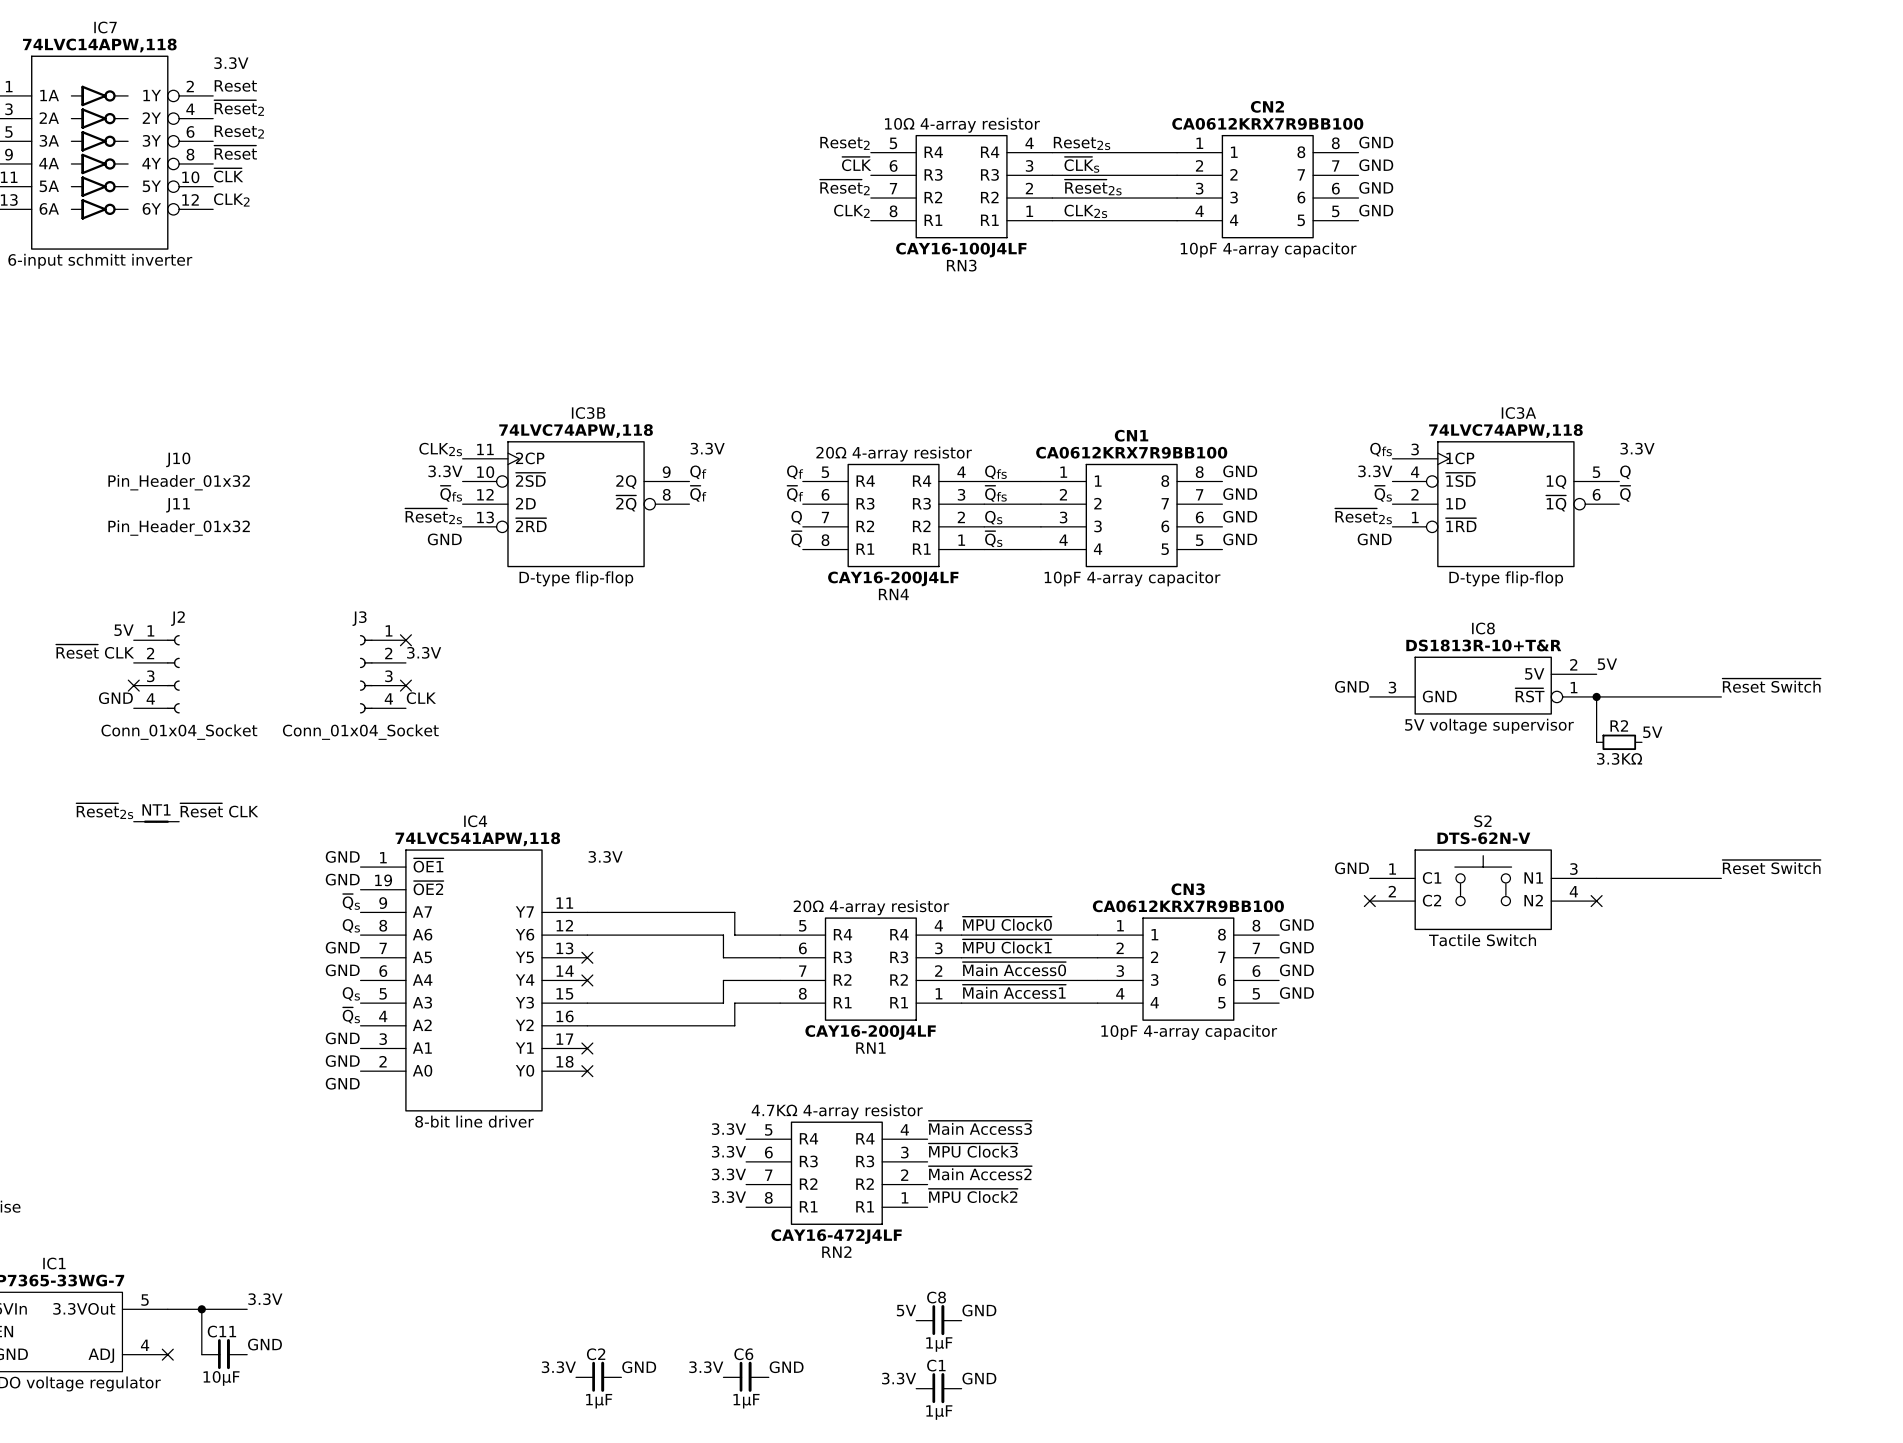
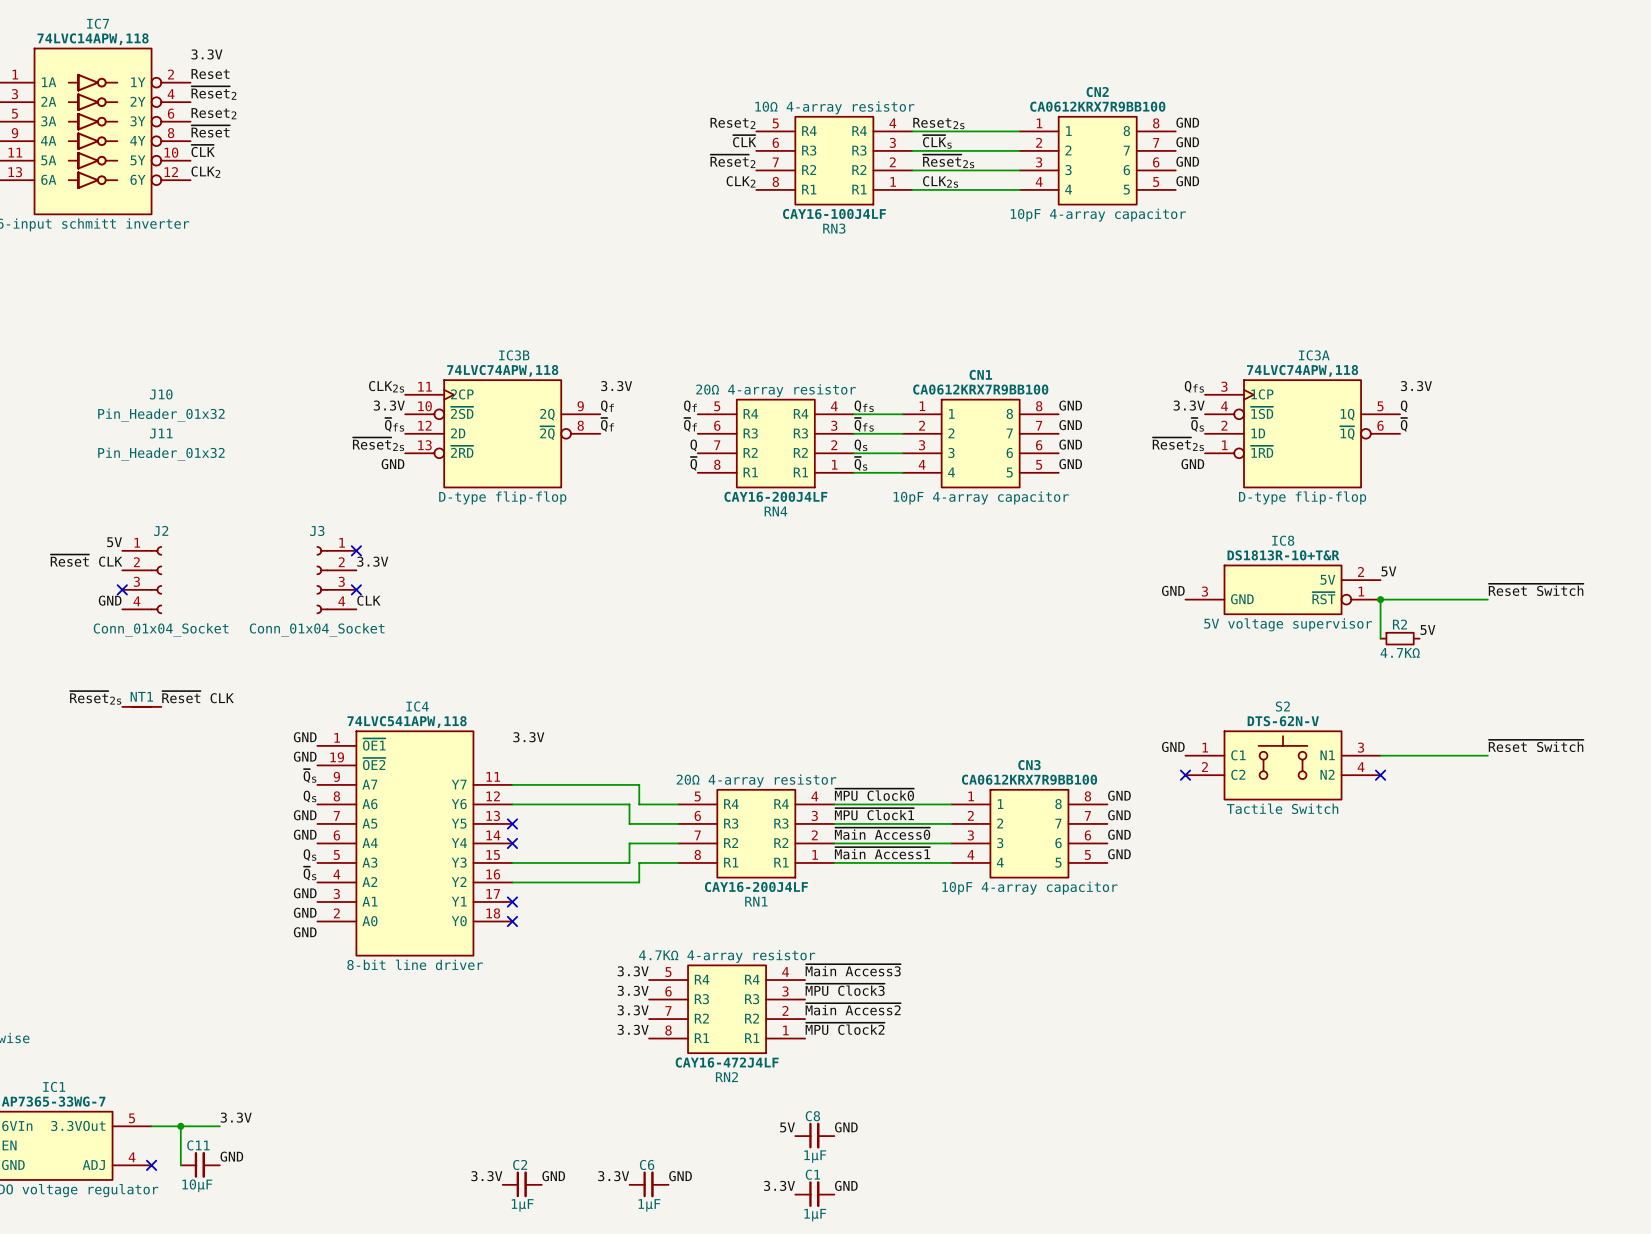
R2 value: 3.3KΩ (1619, 758) -> 4.7KΩ (1400, 652)

